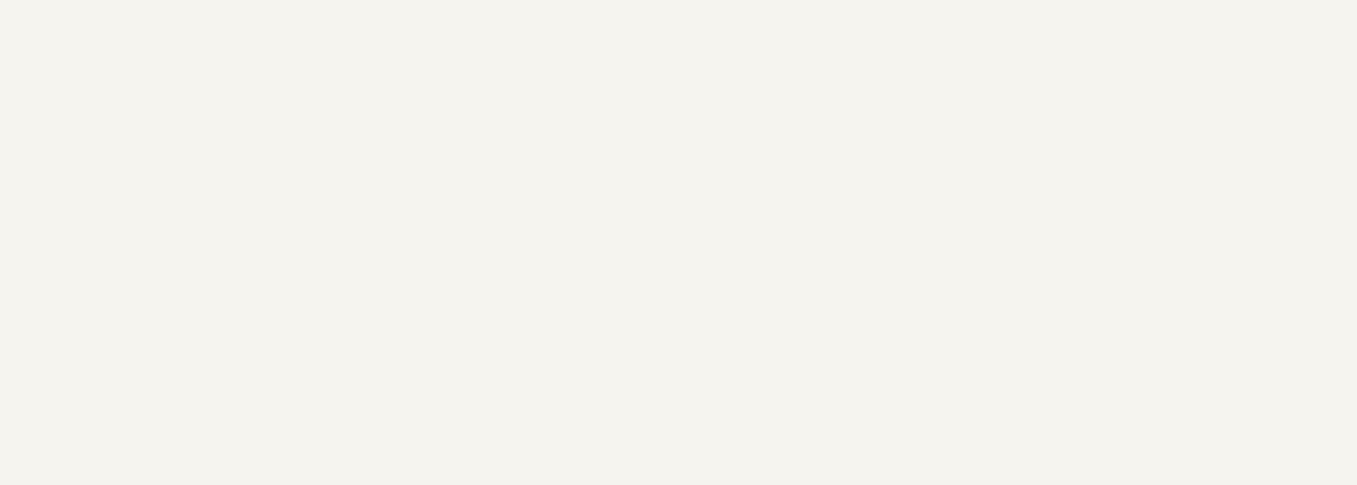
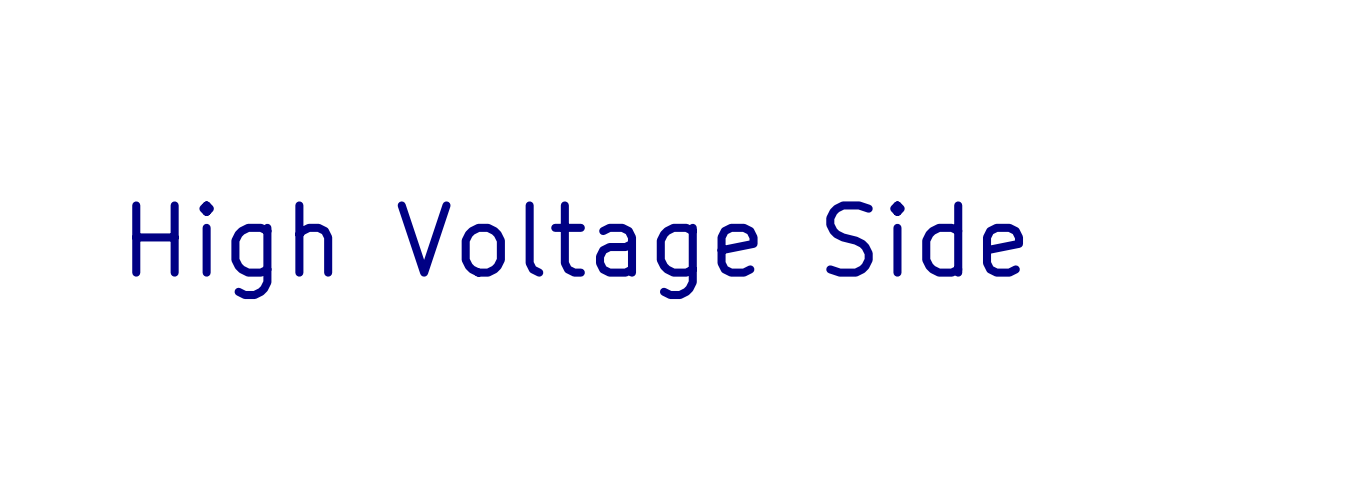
text: none -> High Voltage Side (577, 250)

